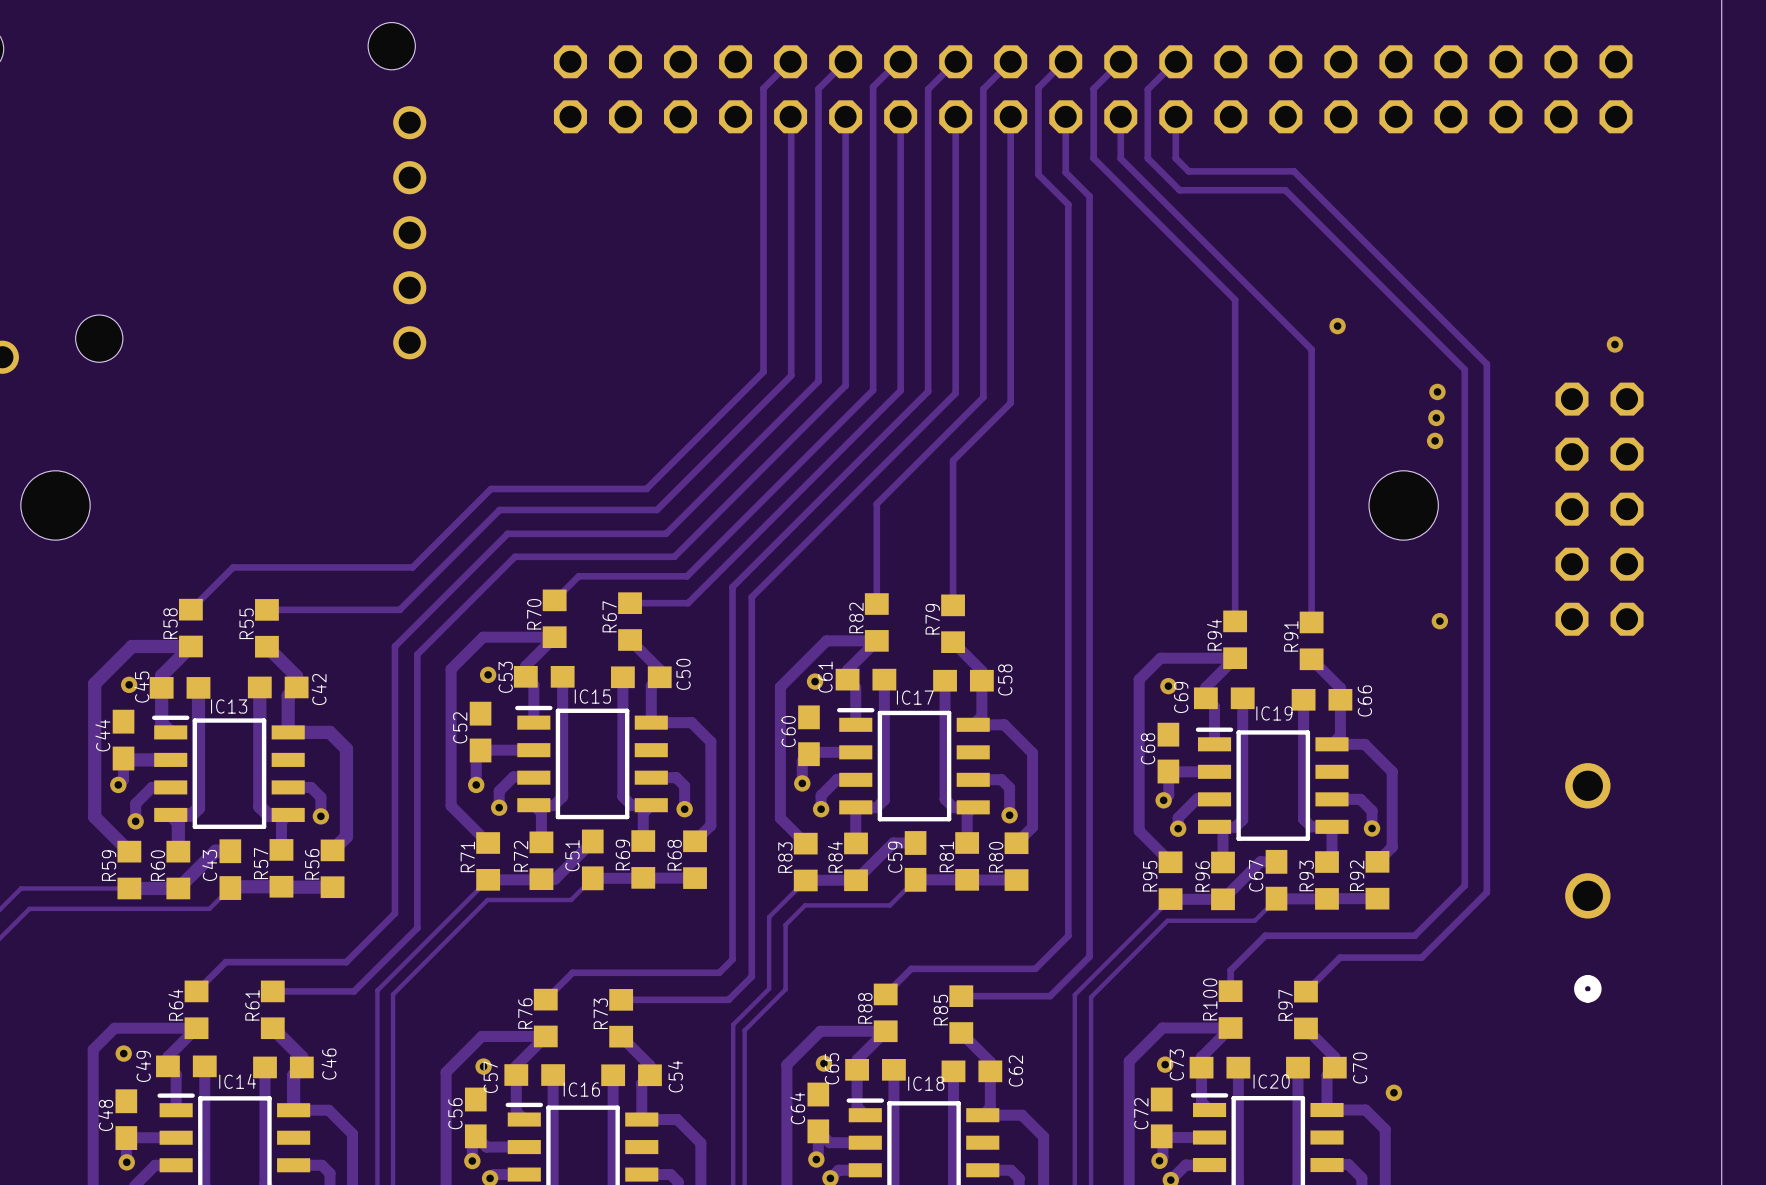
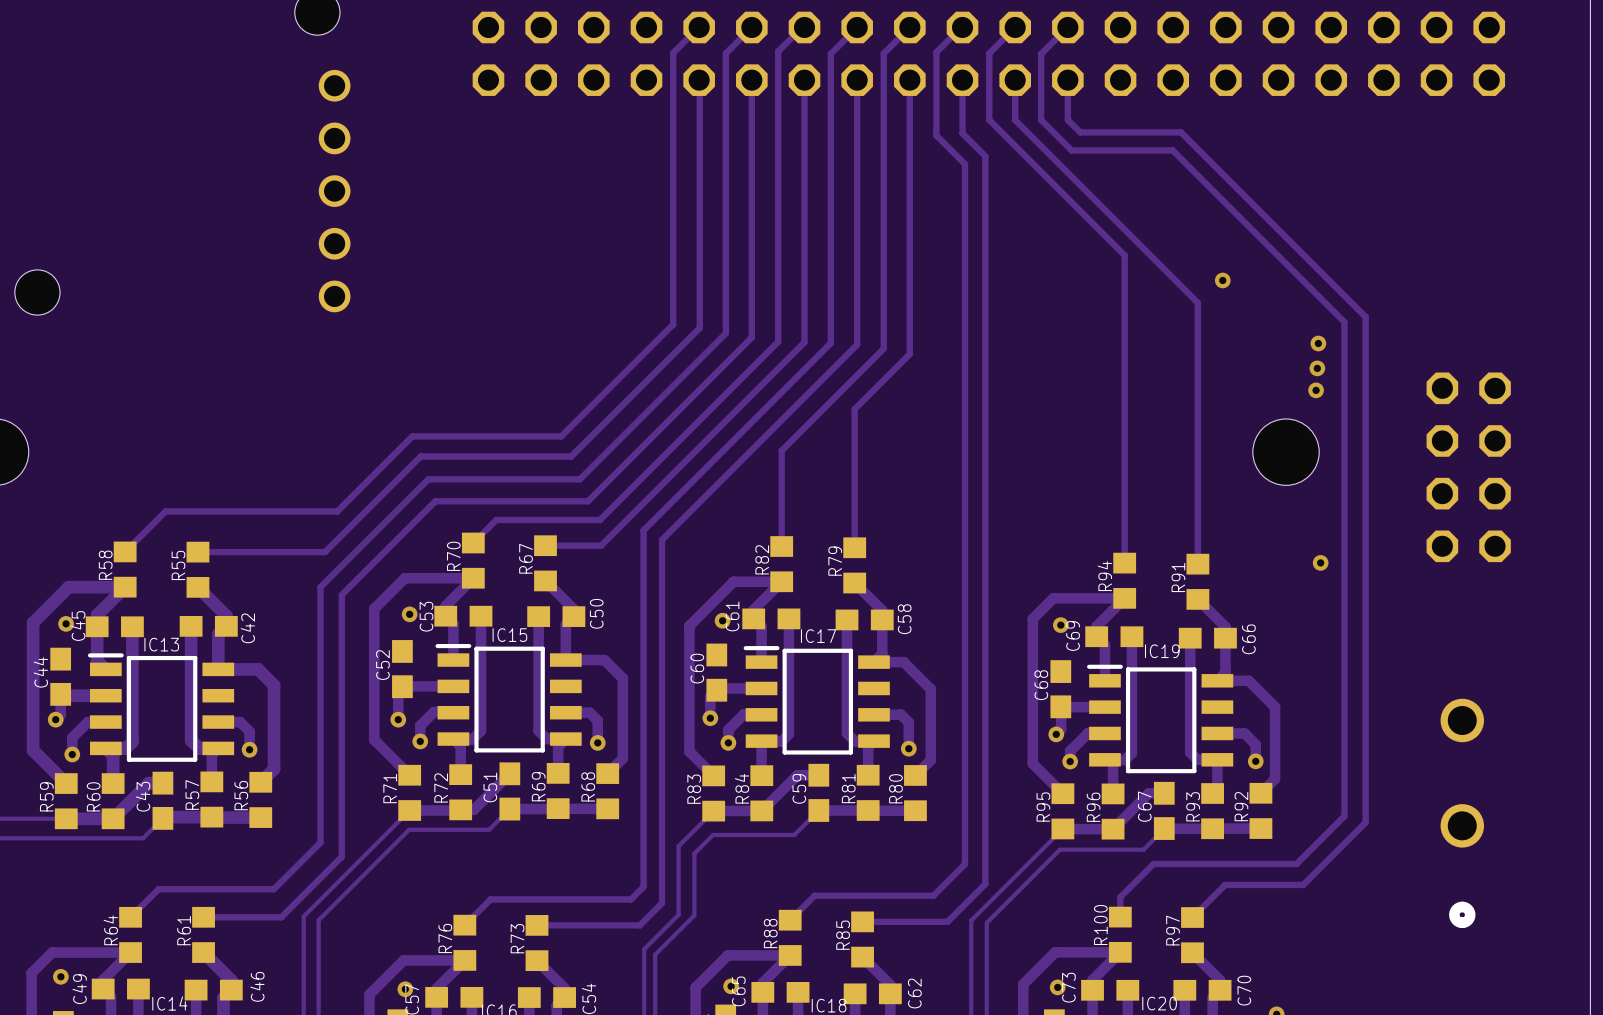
via: (1614, 344) -> none
part footprint: [1555, 382, 1644, 636] -> [1426, 372, 1511, 563]

